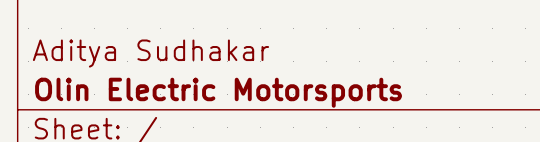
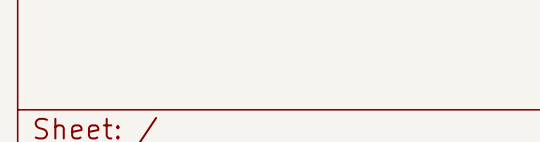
title block: Aditya Sudhakar (150, 53) -> none
title block: Olin Electric Motorsports (218, 92) -> none

